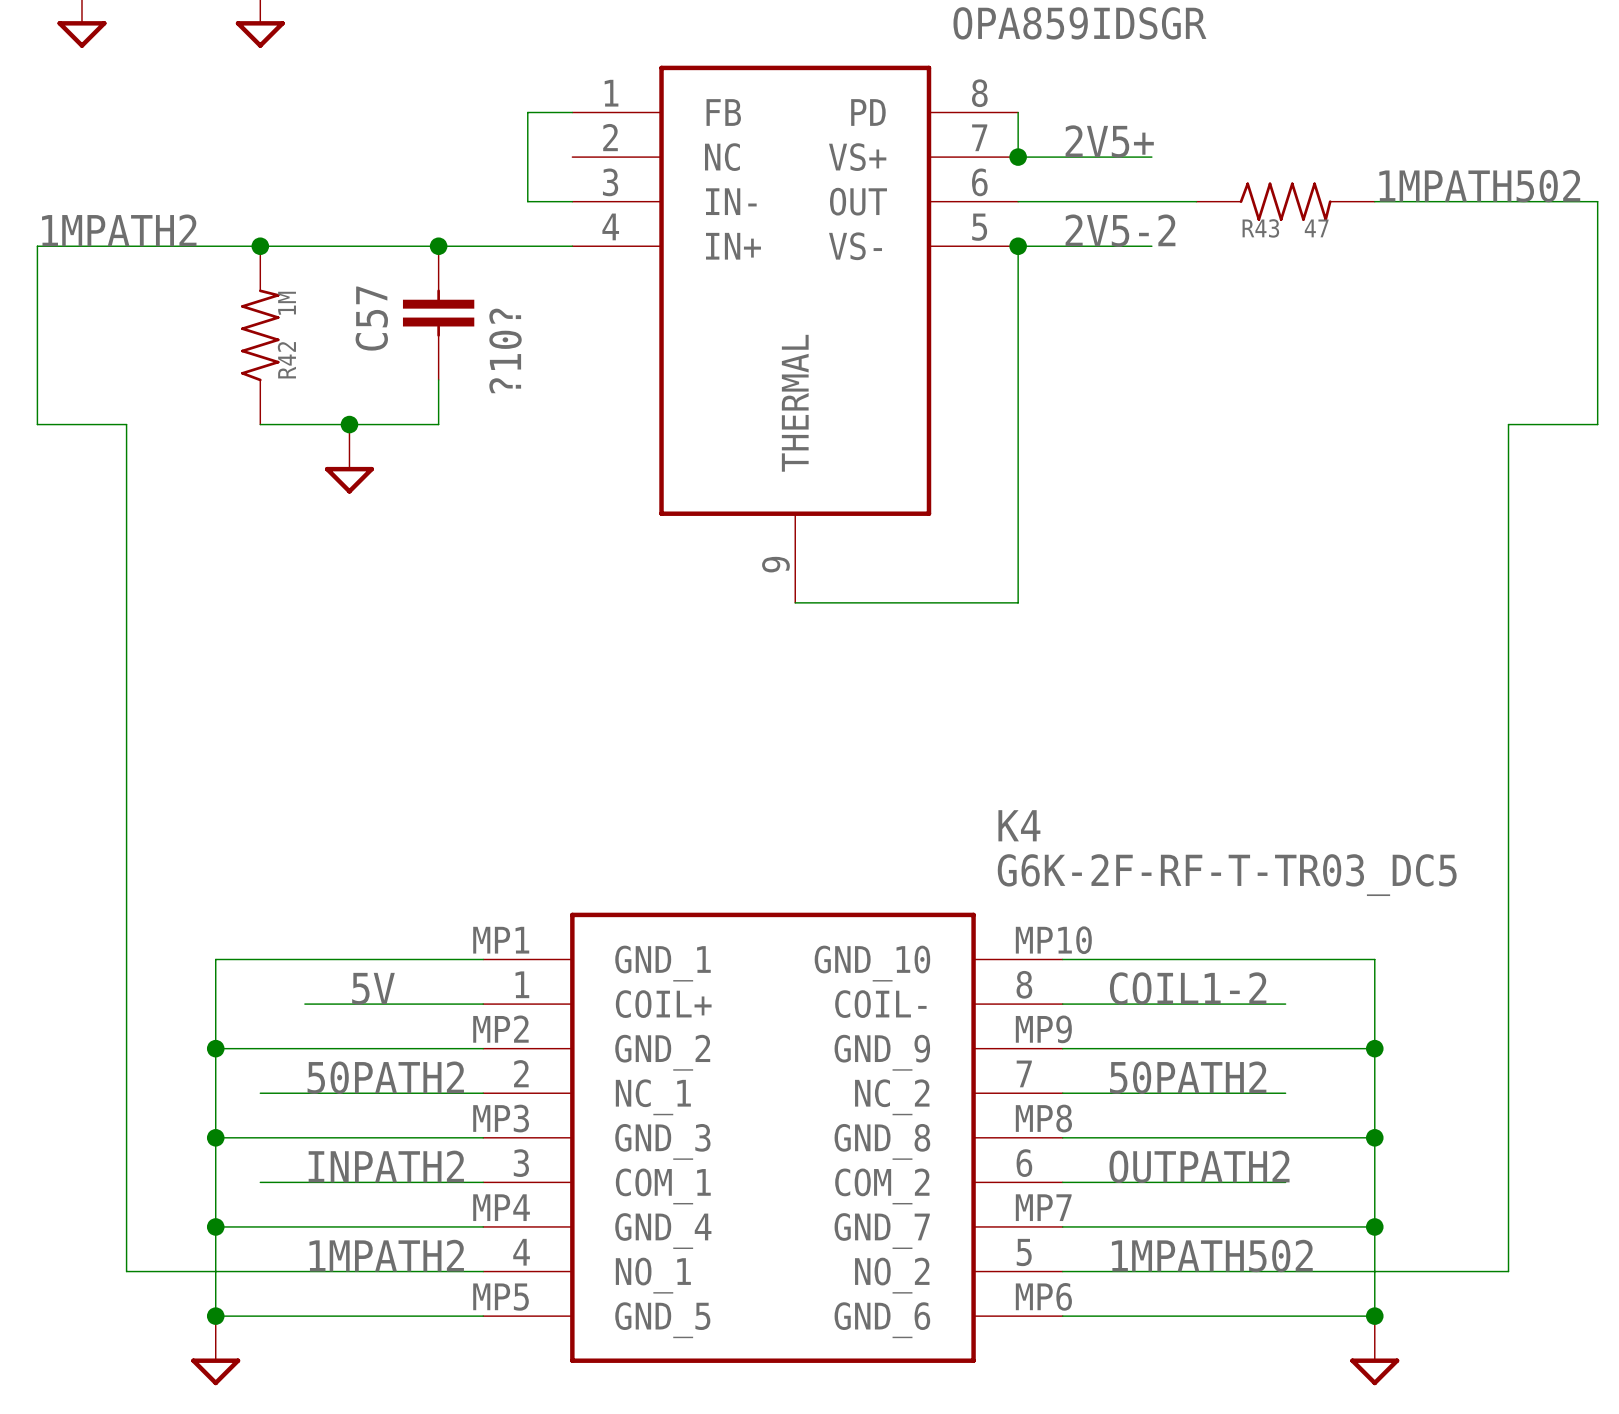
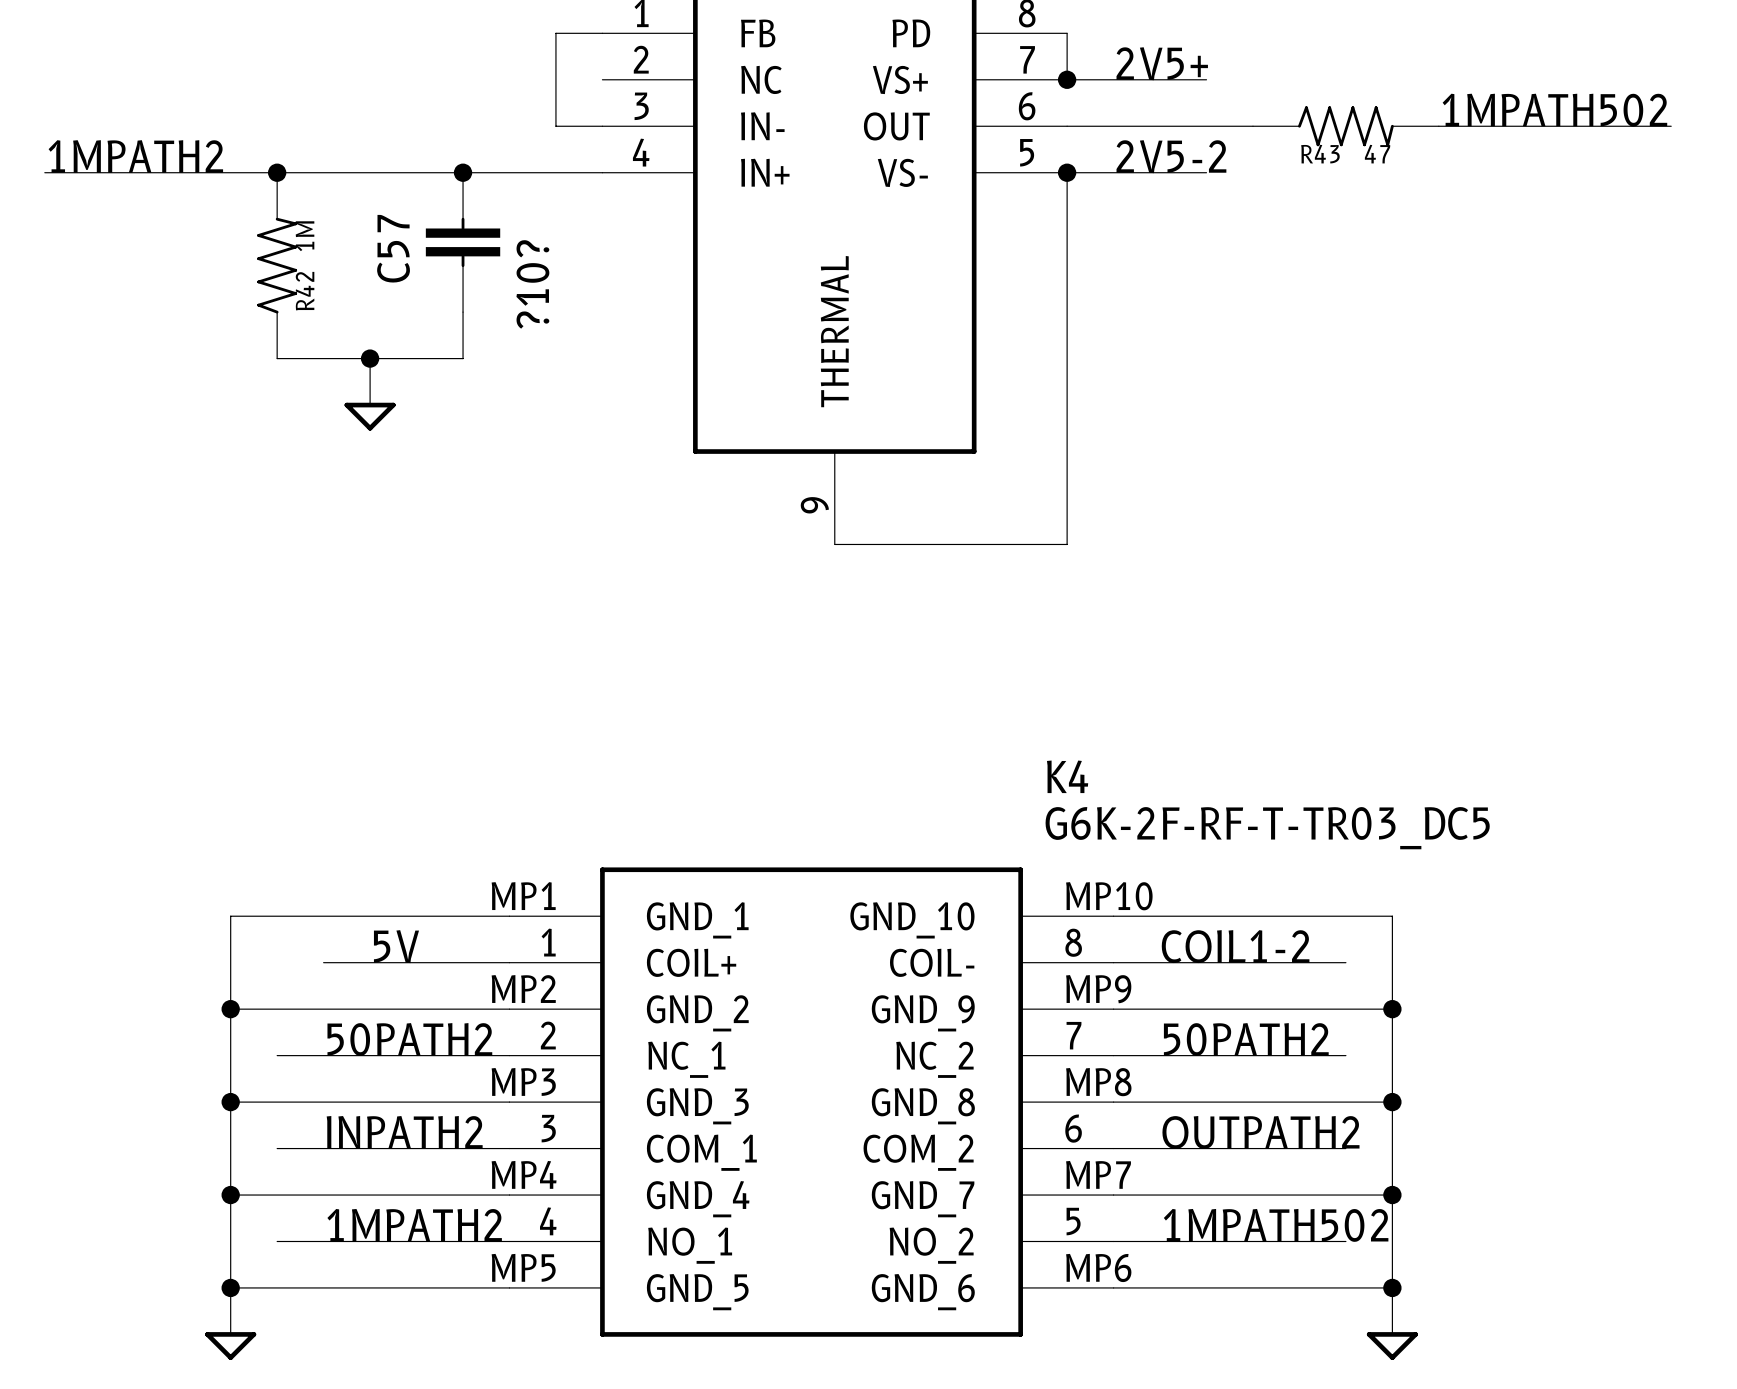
wire: (1597, 201) (1597, 424) (1508, 424) (1508, 1271) (1285, 1271) -> none
wire: (37, 246) (37, 424) (126, 424) (126, 1271) (260, 1271) -> none
wire: (1330, 959) (1374, 959) (1374, 1316) (1330, 1316) -> (1392, 916) (1392, 1287)
wire: (1330, 1048) (1374, 1048) -> none
junction position: (1374, 1048) -> (1392, 1009)
wire: (1330, 1137) (1374, 1137) -> none
junction position: (1374, 1137) -> (1392, 1102)
wire: (1330, 1226) (1374, 1226) -> none
junction position: (1374, 1226) -> (1392, 1195)
junction position: (1374, 1316) -> (1392, 1287)
power symbol position: (1374, 1350) -> (1392, 1323)

